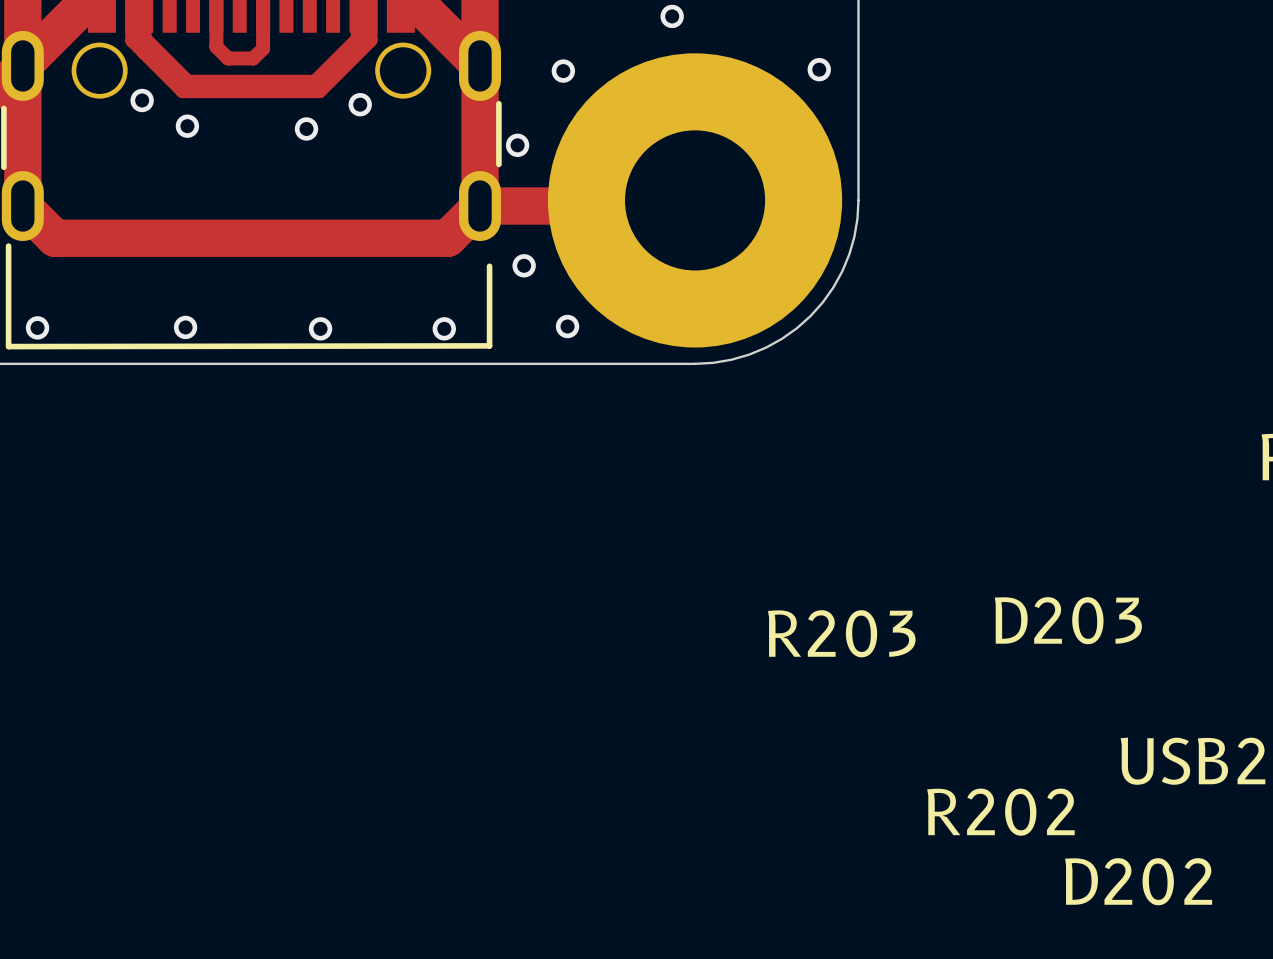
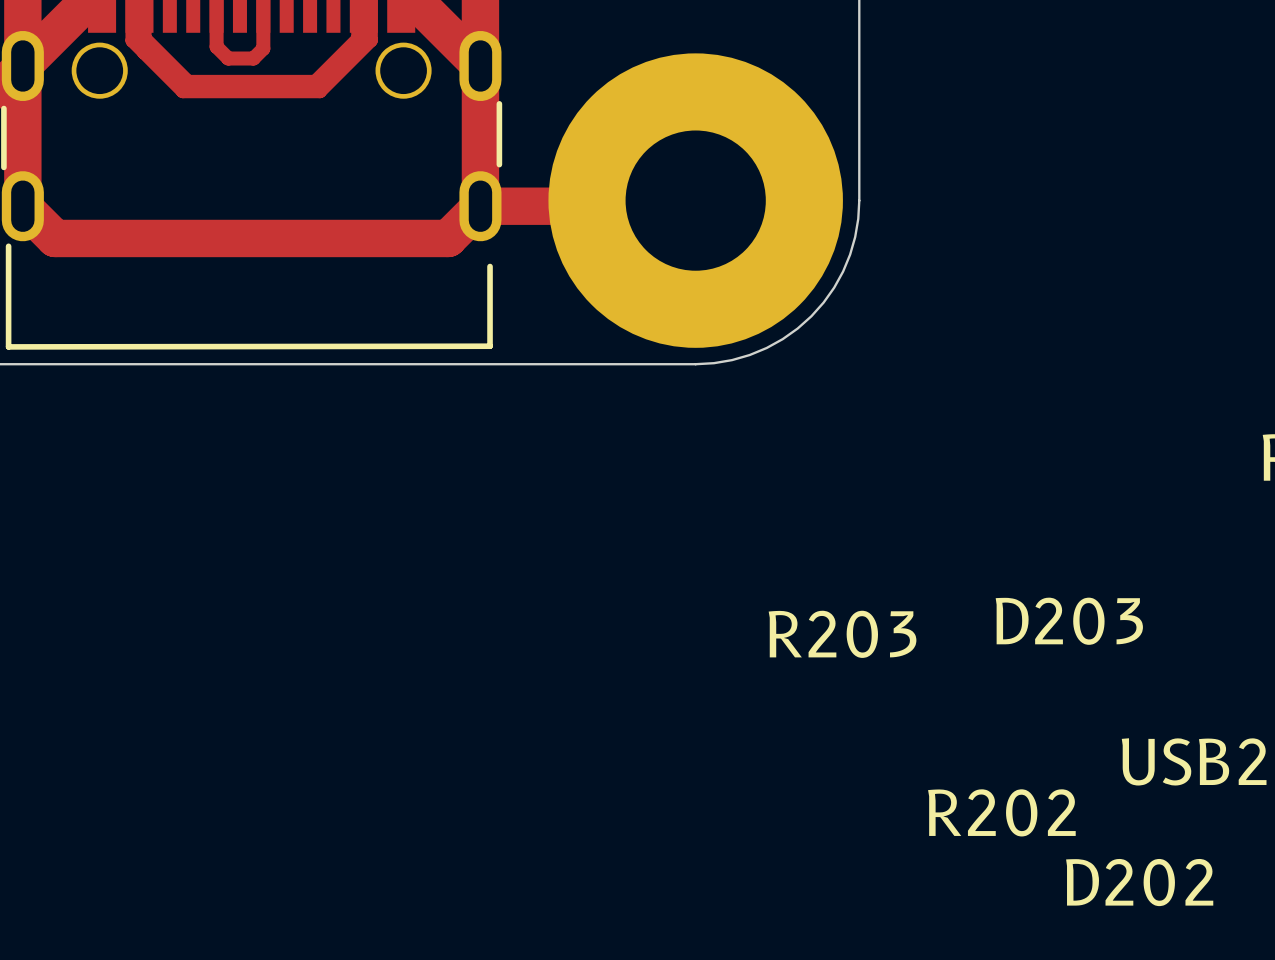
via: (672, 16) -> none
via: (819, 69) -> none
via: (563, 71) -> none
via: (142, 100) -> none
via: (360, 104) -> none
via: (187, 126) -> none
via: (306, 128) -> none
via: (517, 145) -> none
via: (524, 265) -> none
via: (567, 326) -> none
via: (37, 327) -> none
via: (185, 327) -> none
via: (320, 328) -> none
via: (444, 328) -> none

